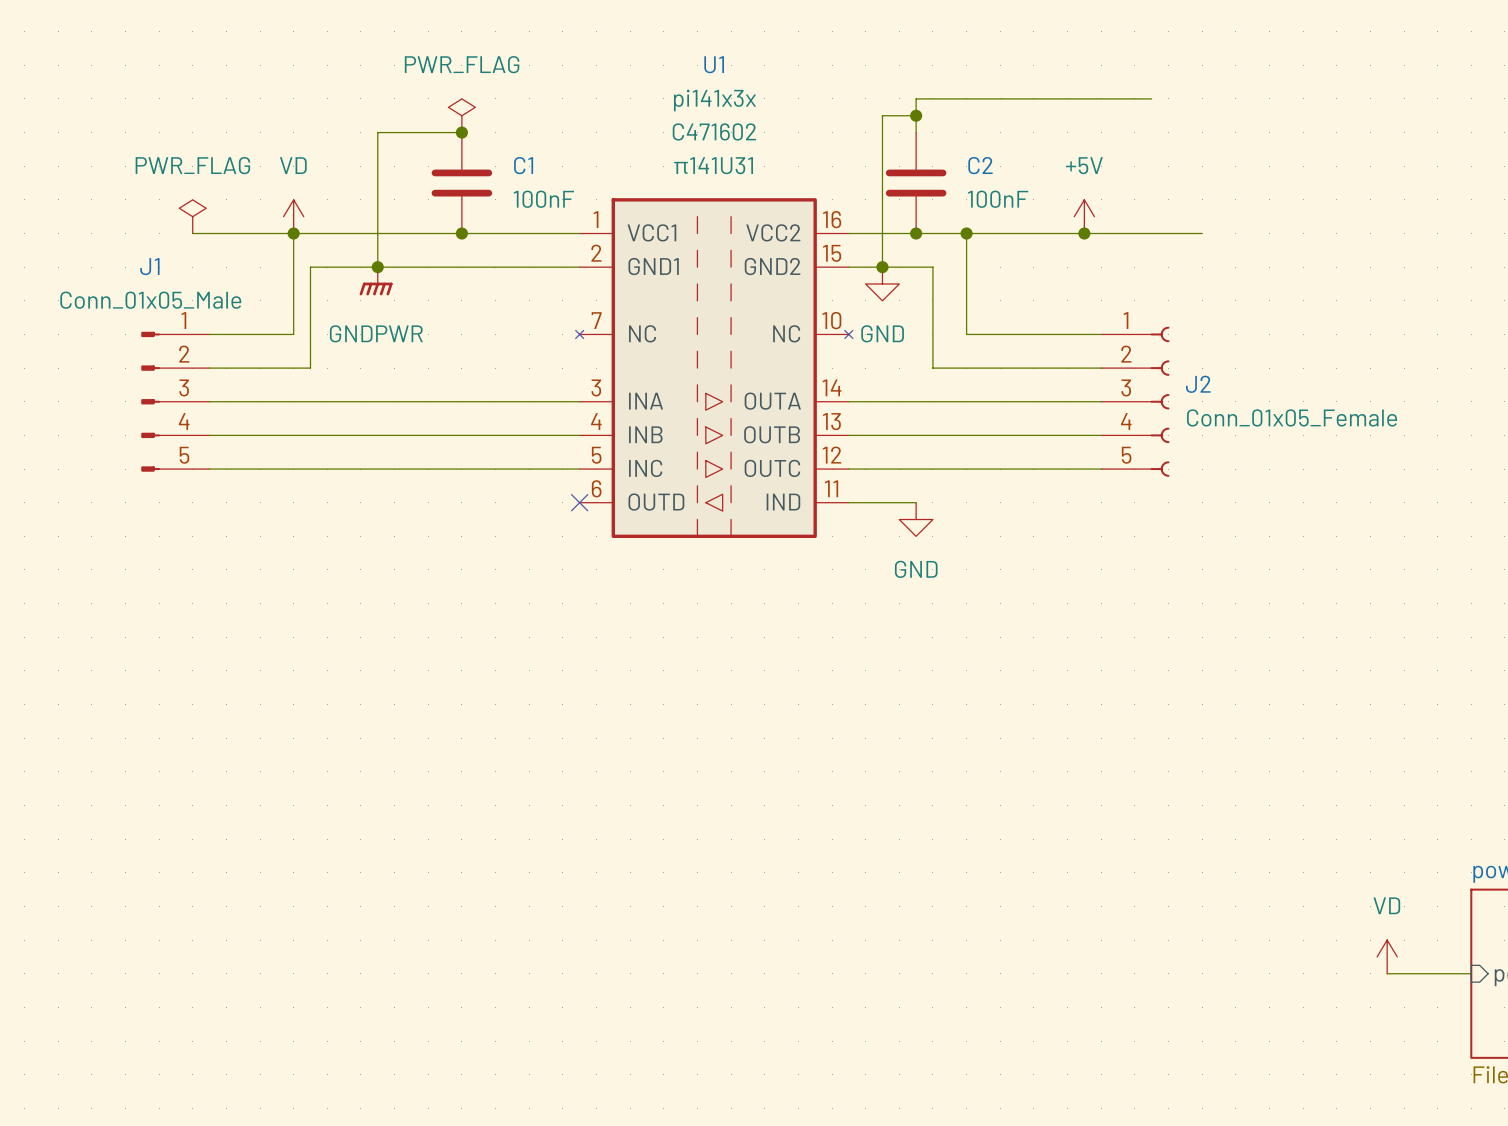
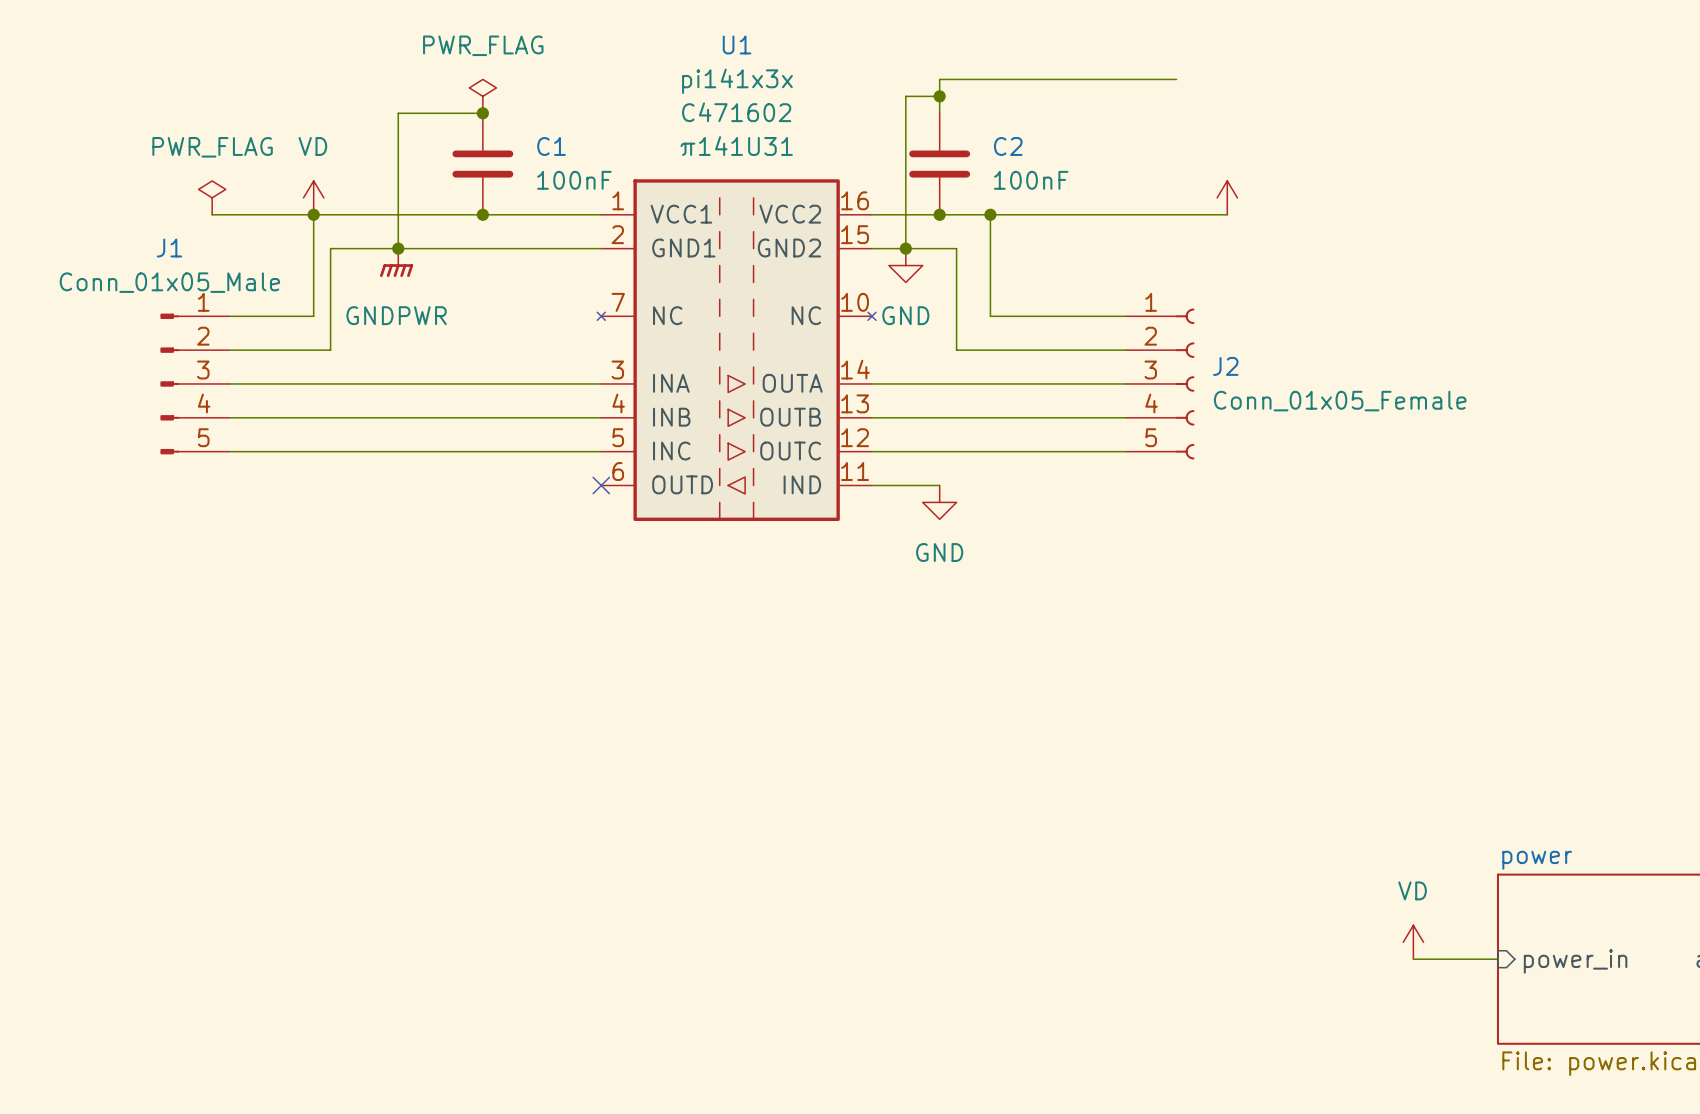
power symbol: +5V (1084, 216) -> none
power symbol: none -> (1227, 197)
junction: (1084, 233) -> none

